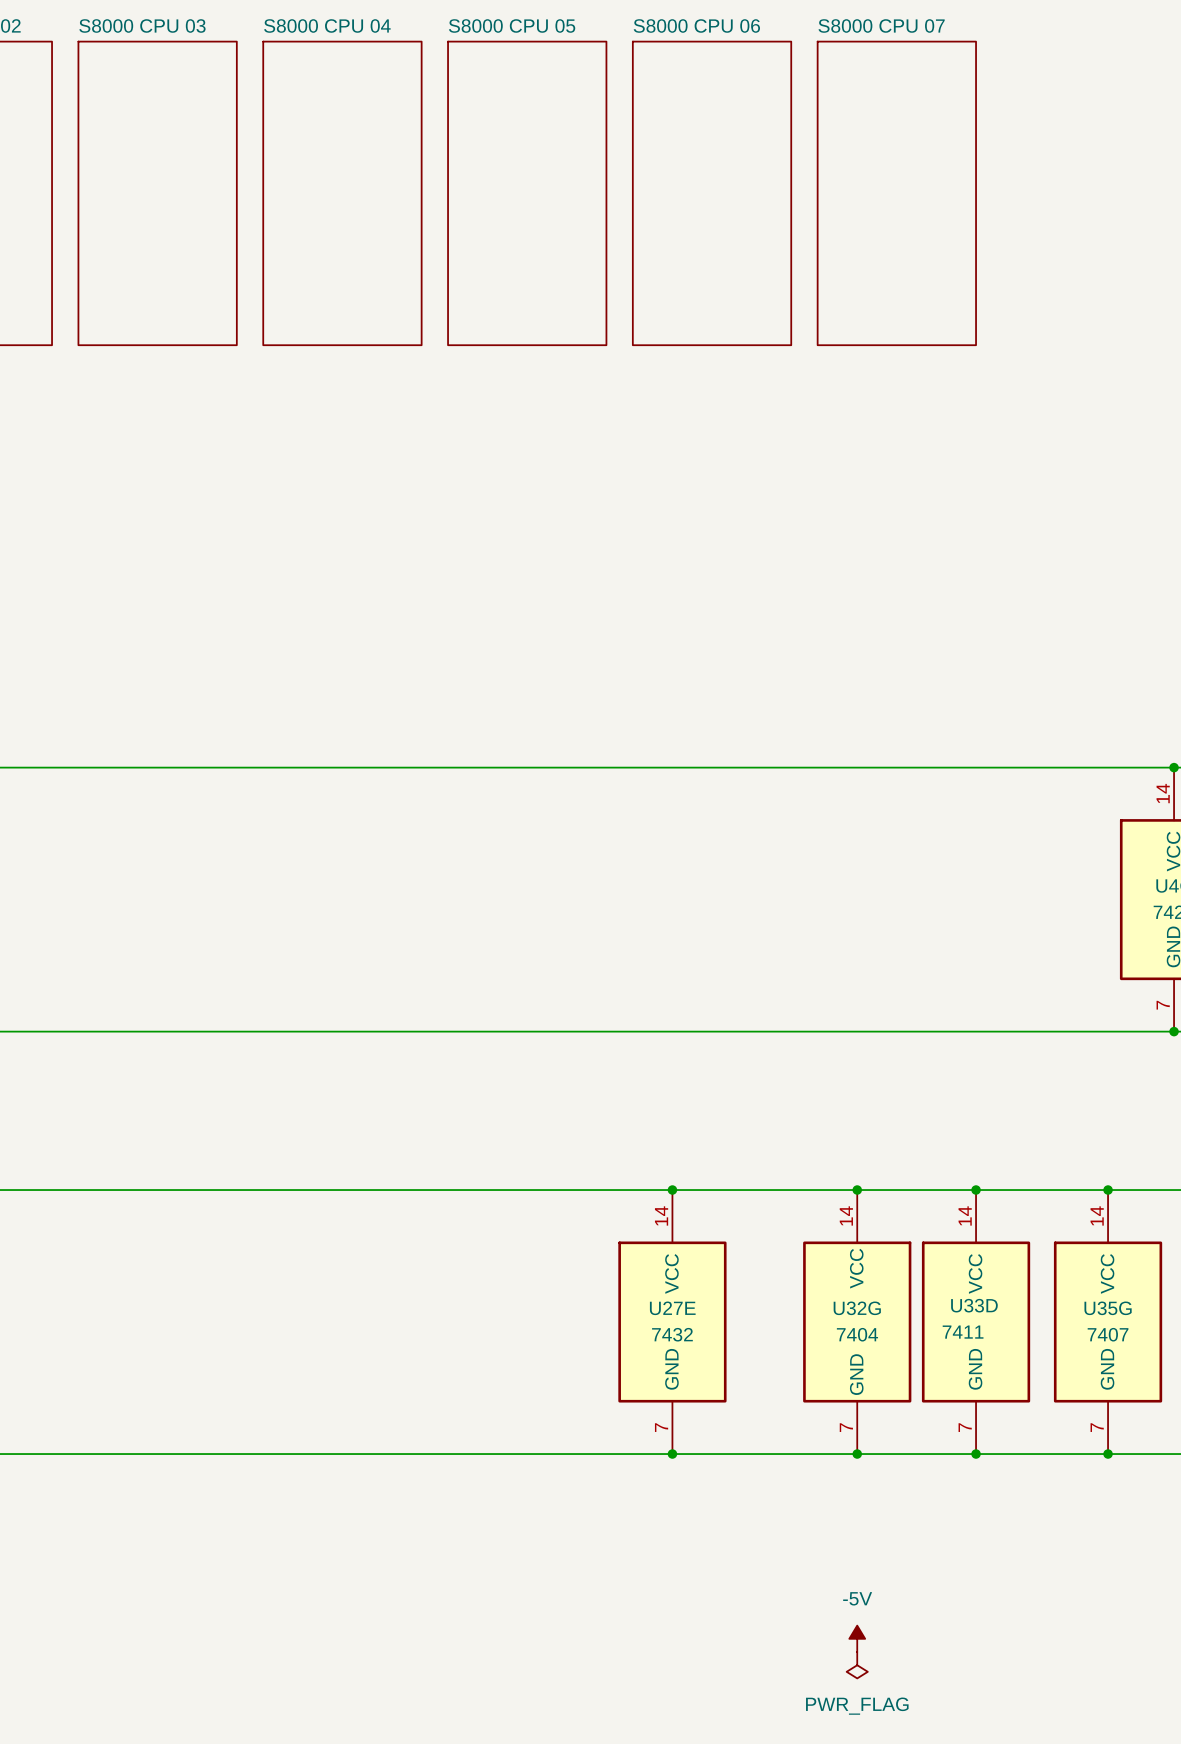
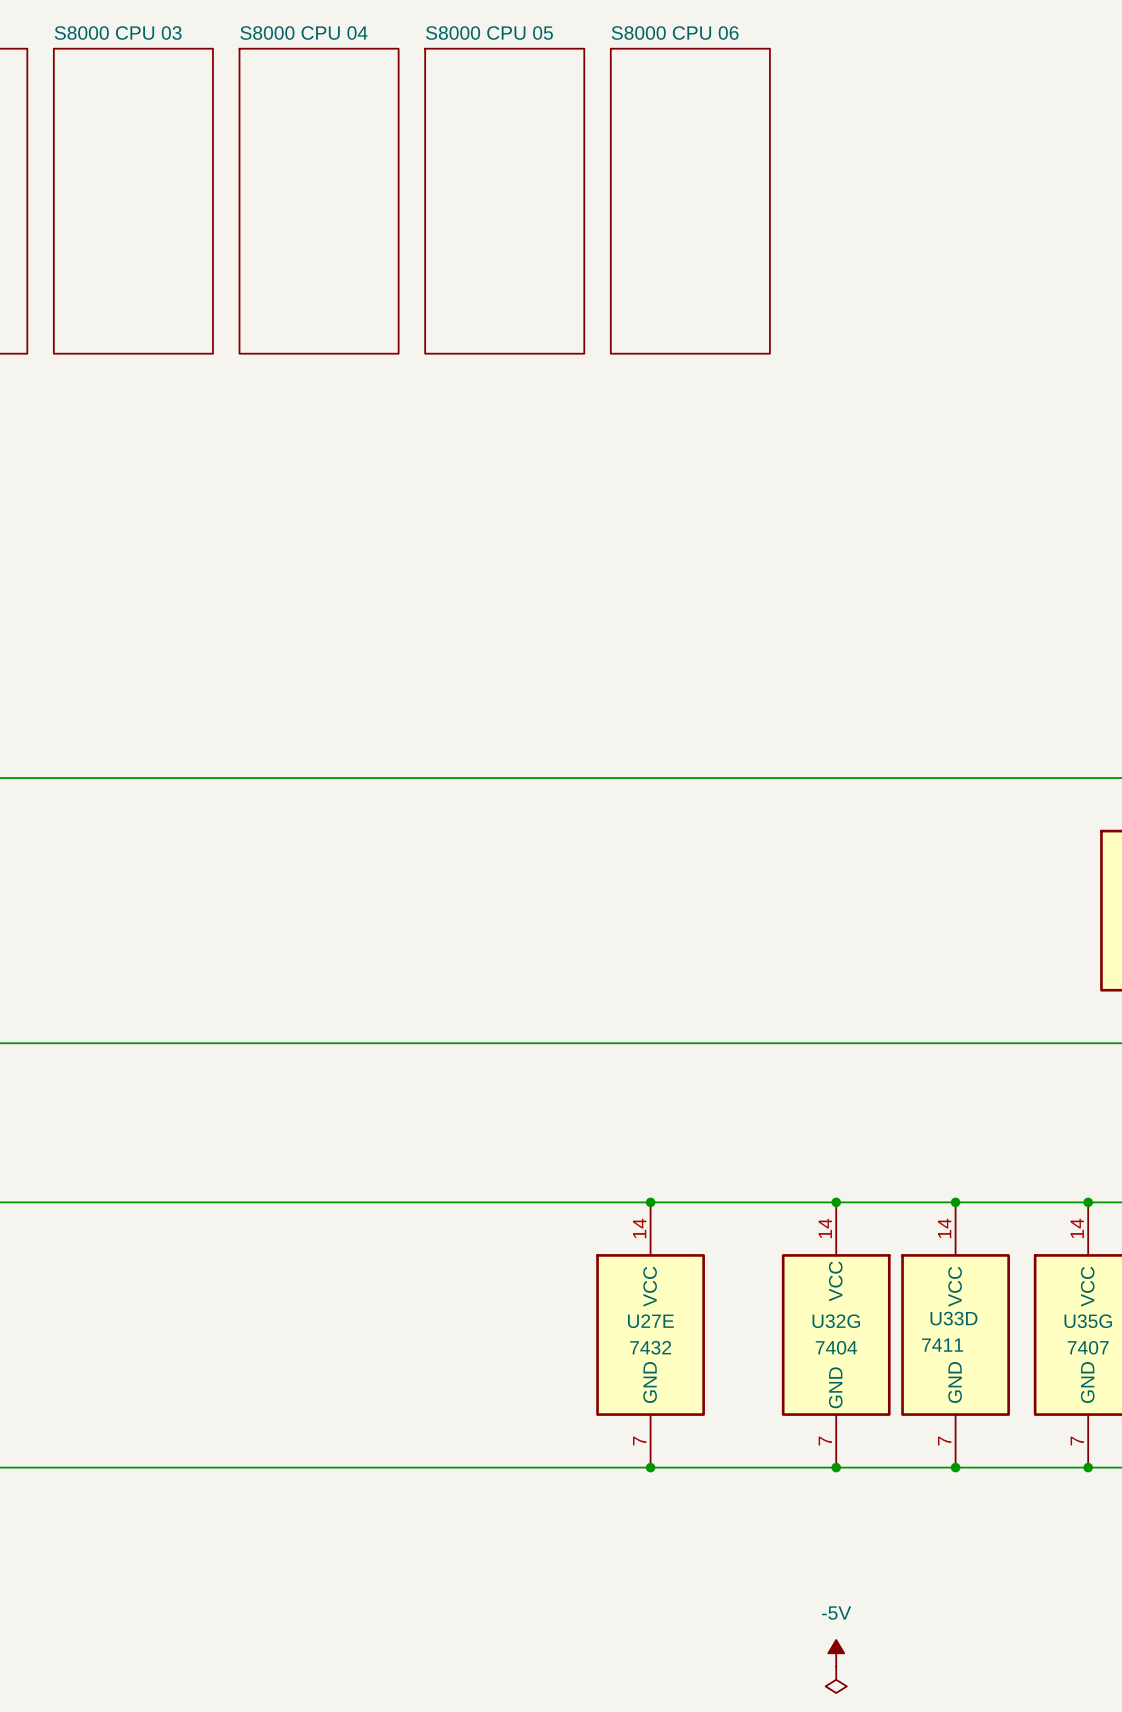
sheet S8000 CPU 07: (896, 193) -> none

